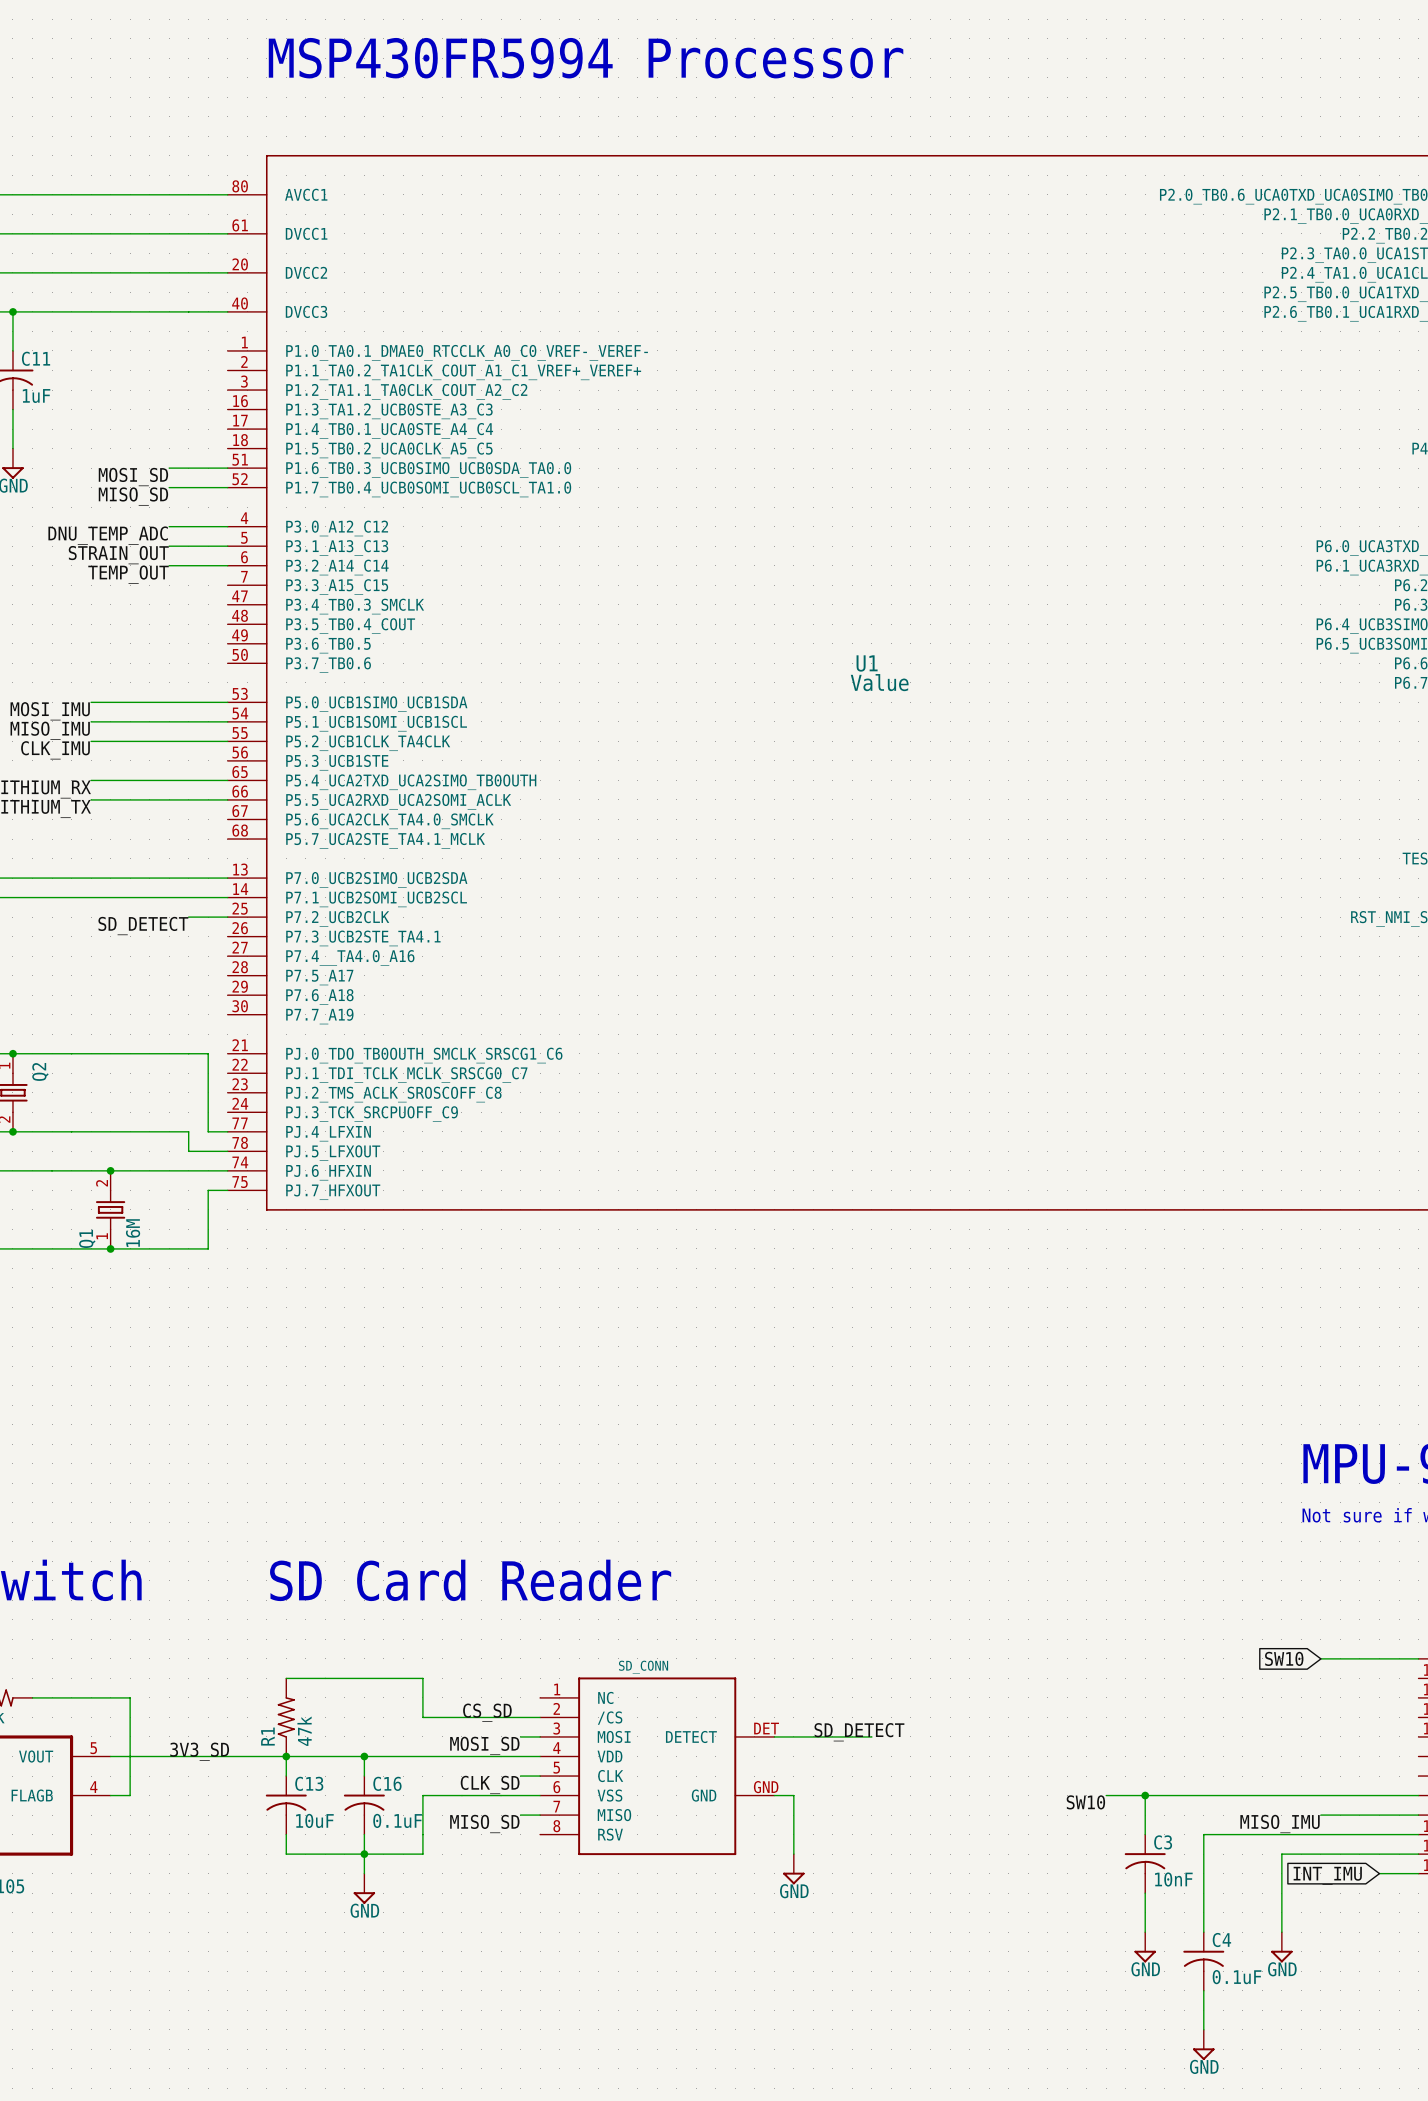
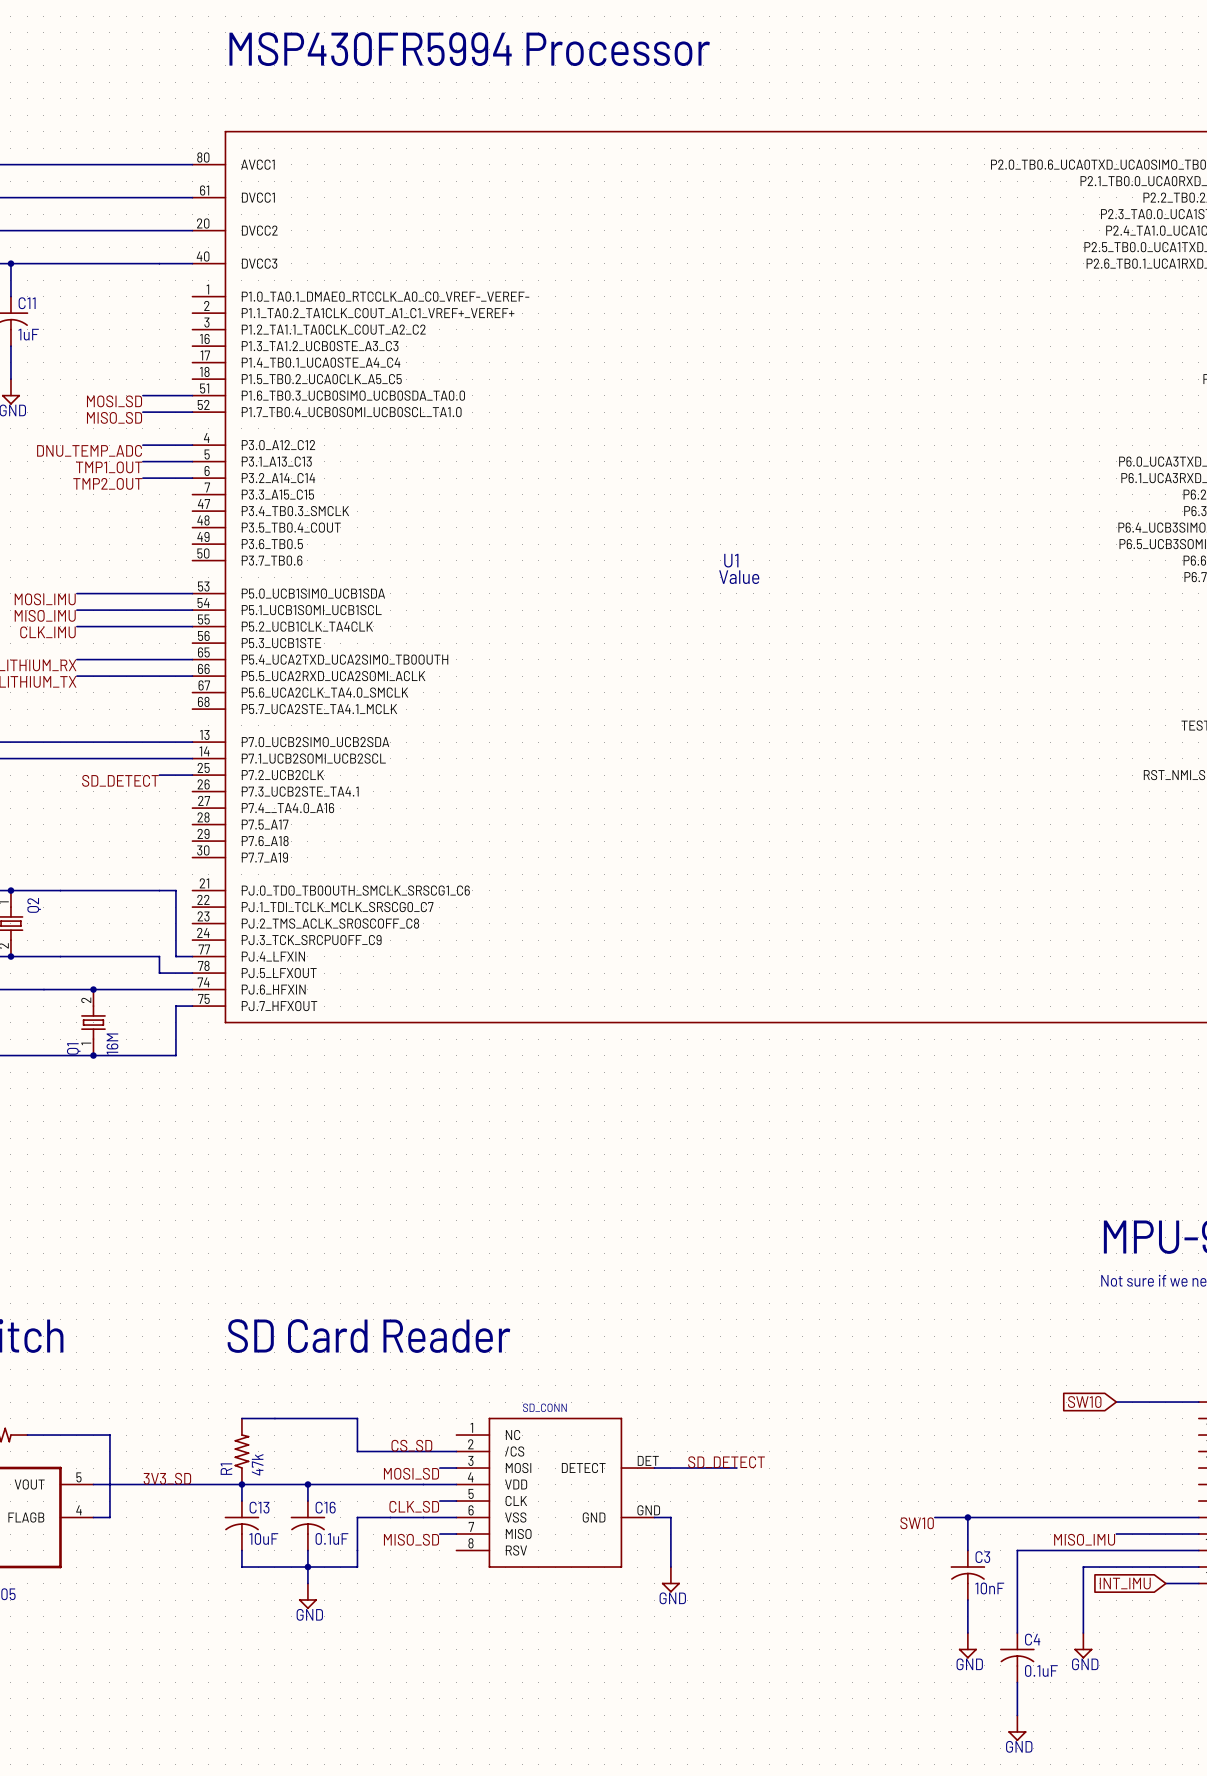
label: STRAIN_OUT (118, 555) -> TMP1_OUT (109, 467)
label: TEMP_OUT (128, 574) -> TMP2_OUT (107, 483)

